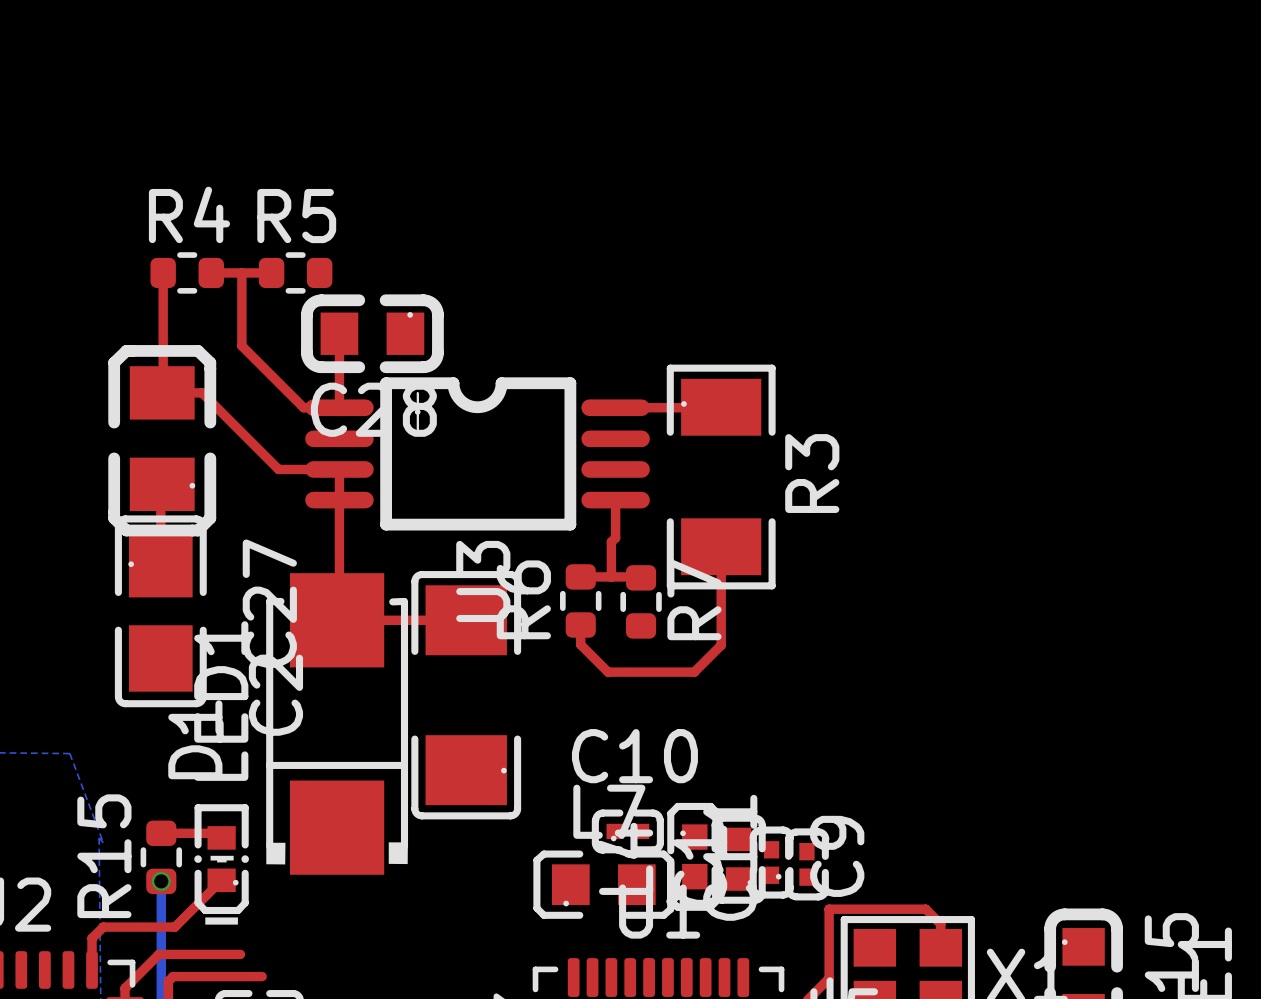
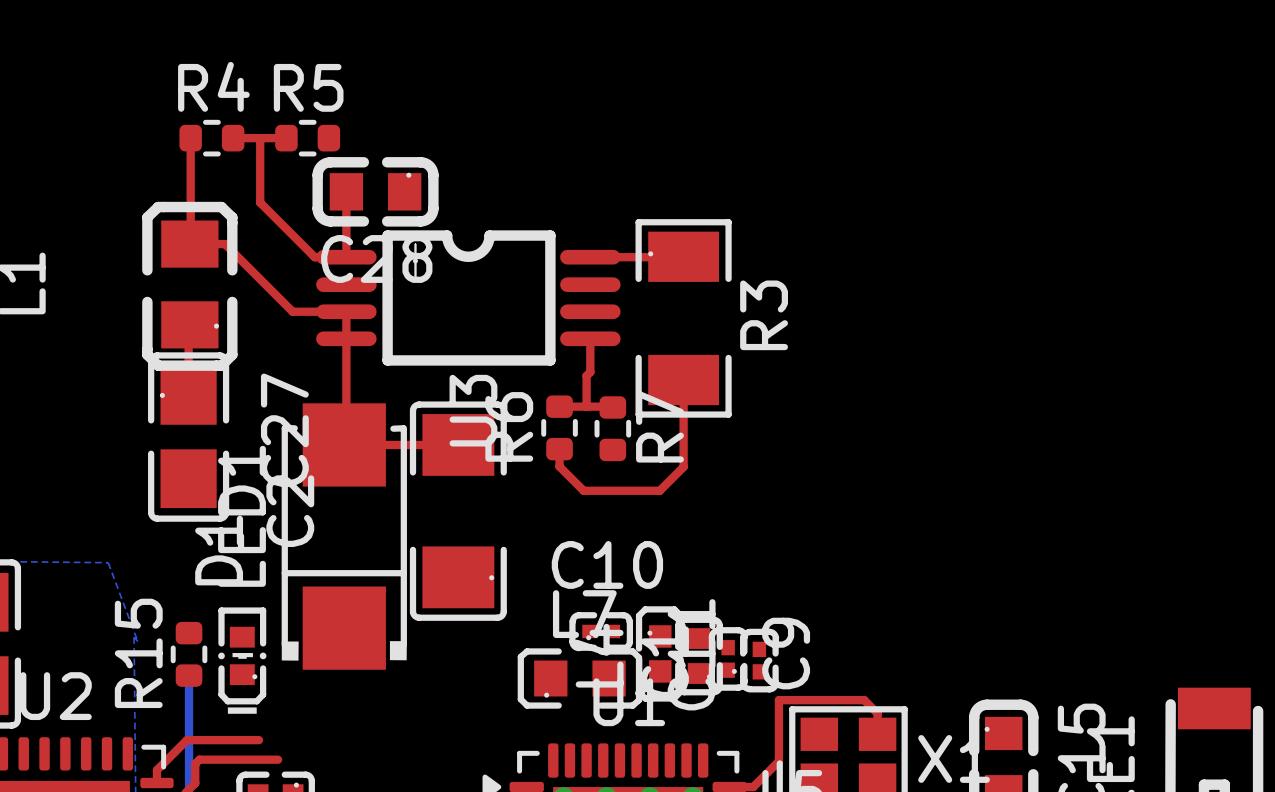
top track: (161, 833) (217, 833) -> none
top track: (221, 880) (174, 927) (103, 927) (92, 938) (92, 969) -> none
via: (161, 881) -> none

